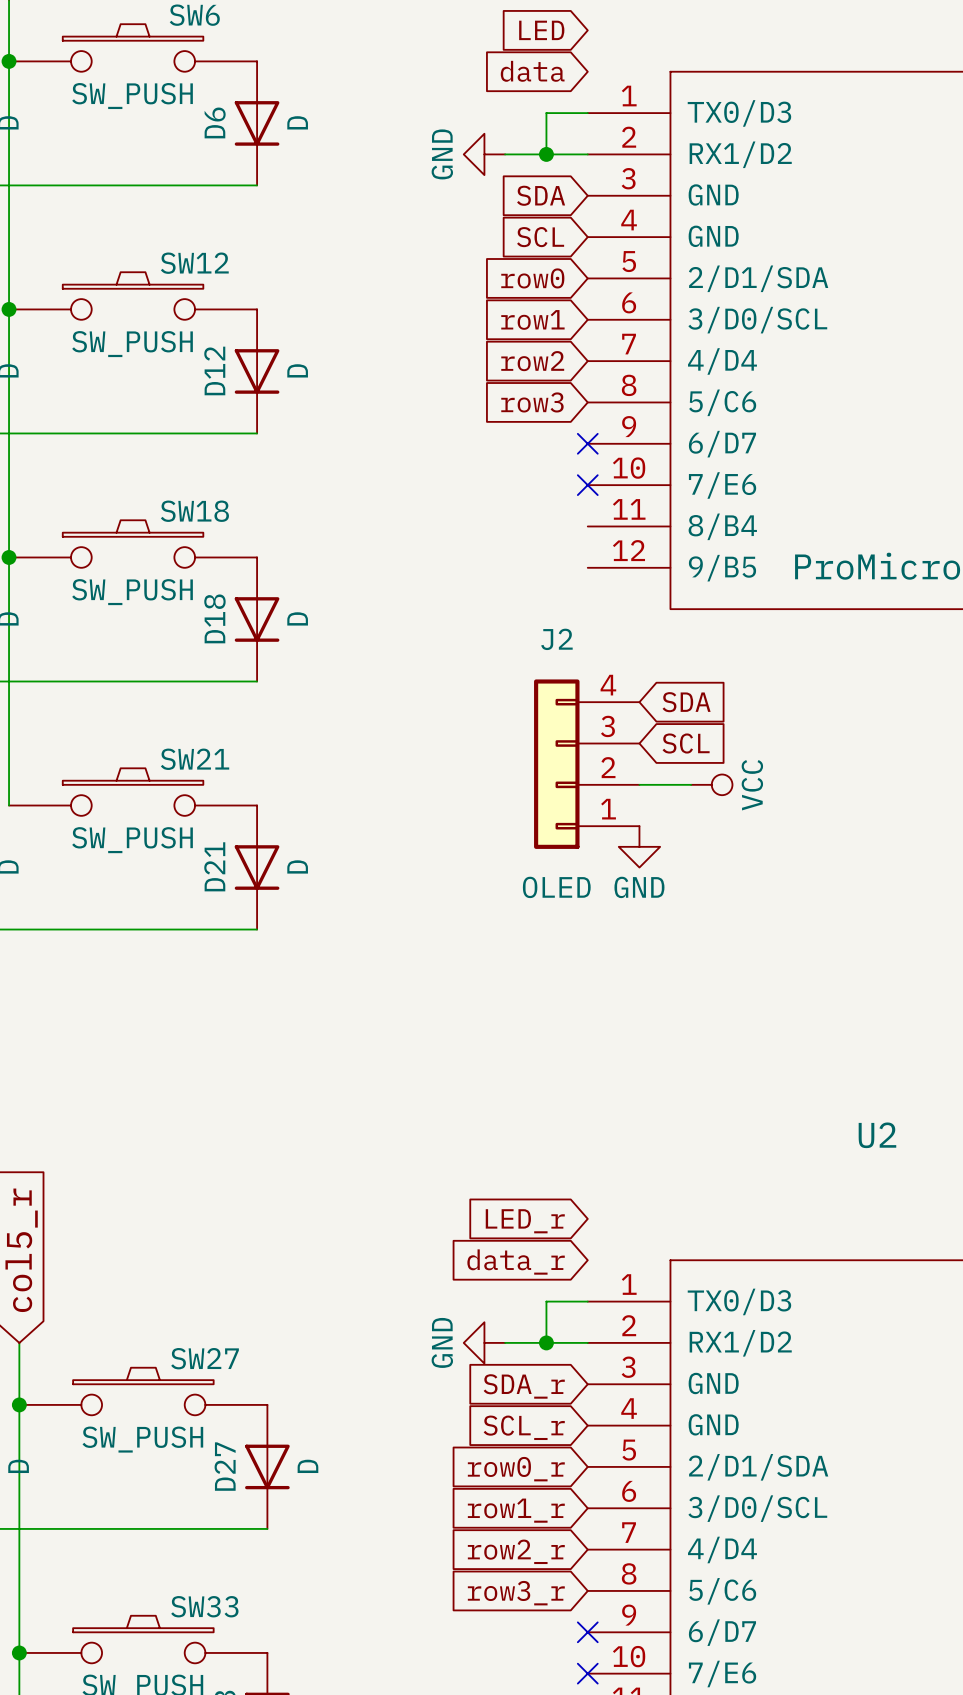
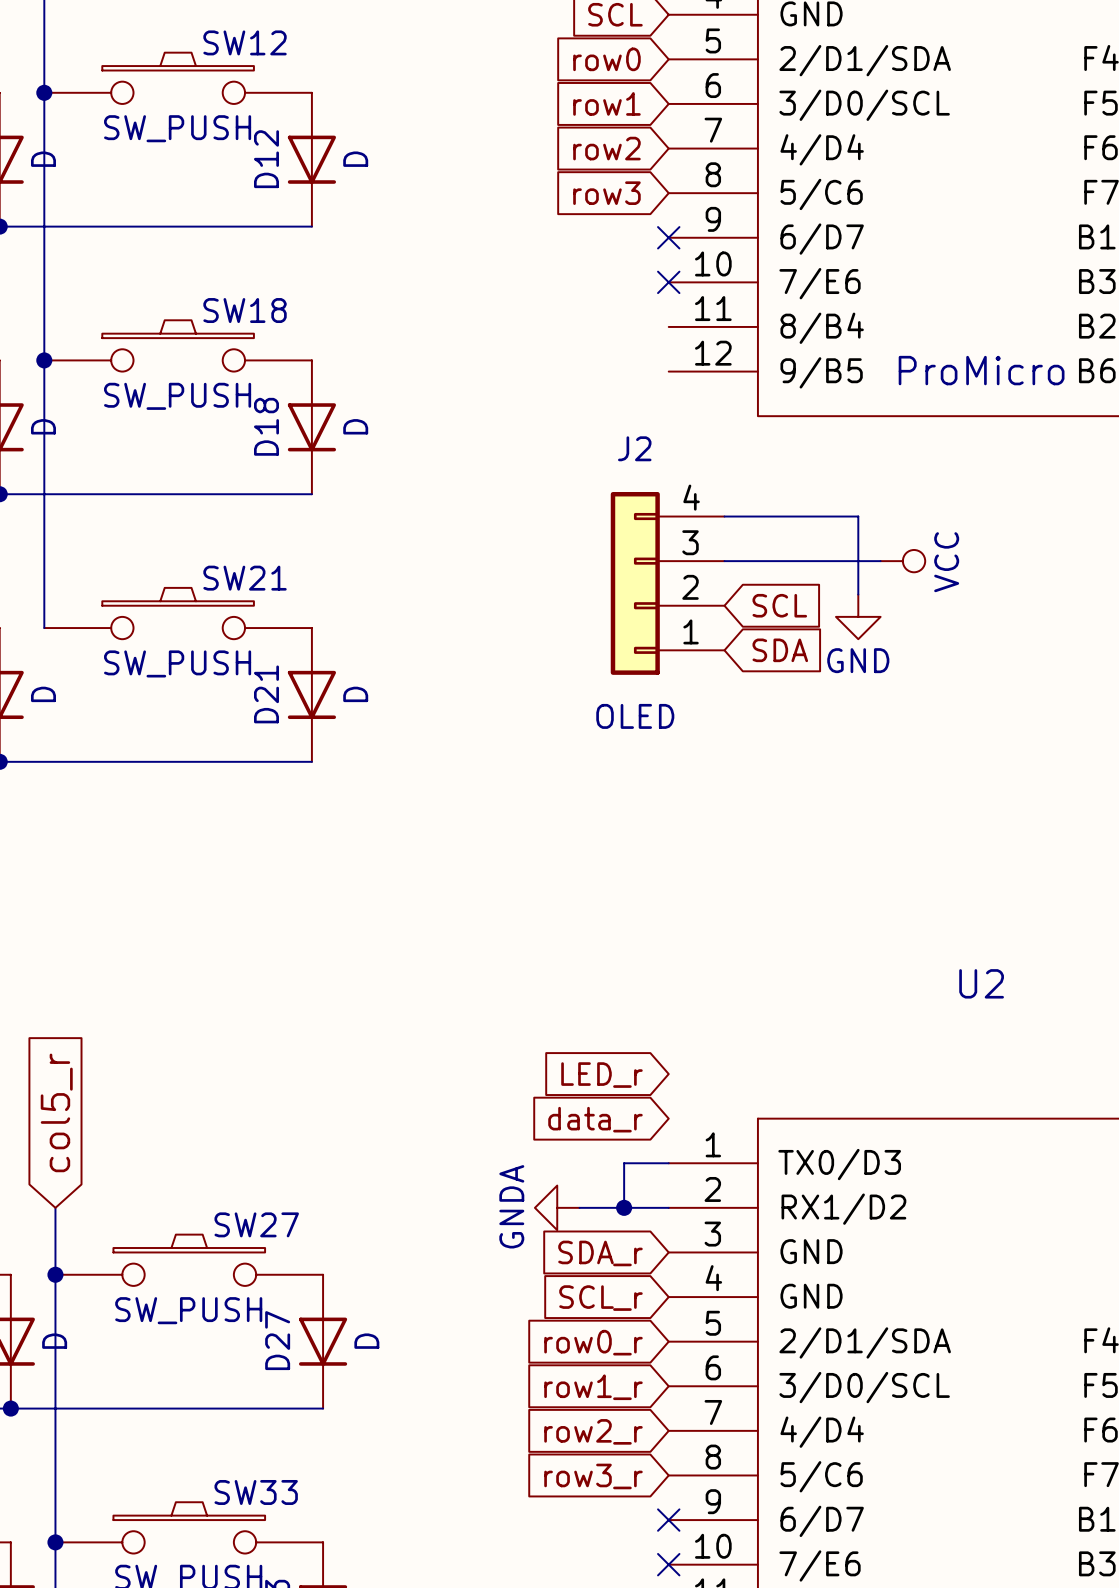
wire: none -> (724, 516) (858, 516) (858, 594)
global label position: SDA (686, 702) -> SDA (780, 650)
wire: none -> (724, 561) (880, 561)
global label position: SCL (686, 743) -> SCL (779, 605)
wire: (639, 784) (691, 784) -> none
power symbol position: VCC (711, 784) -> VCC (902, 561)
power symbol position: GND (639, 846) -> GND (858, 616)
power symbol: GND (484, 1342) -> GNDA (557, 1207)

